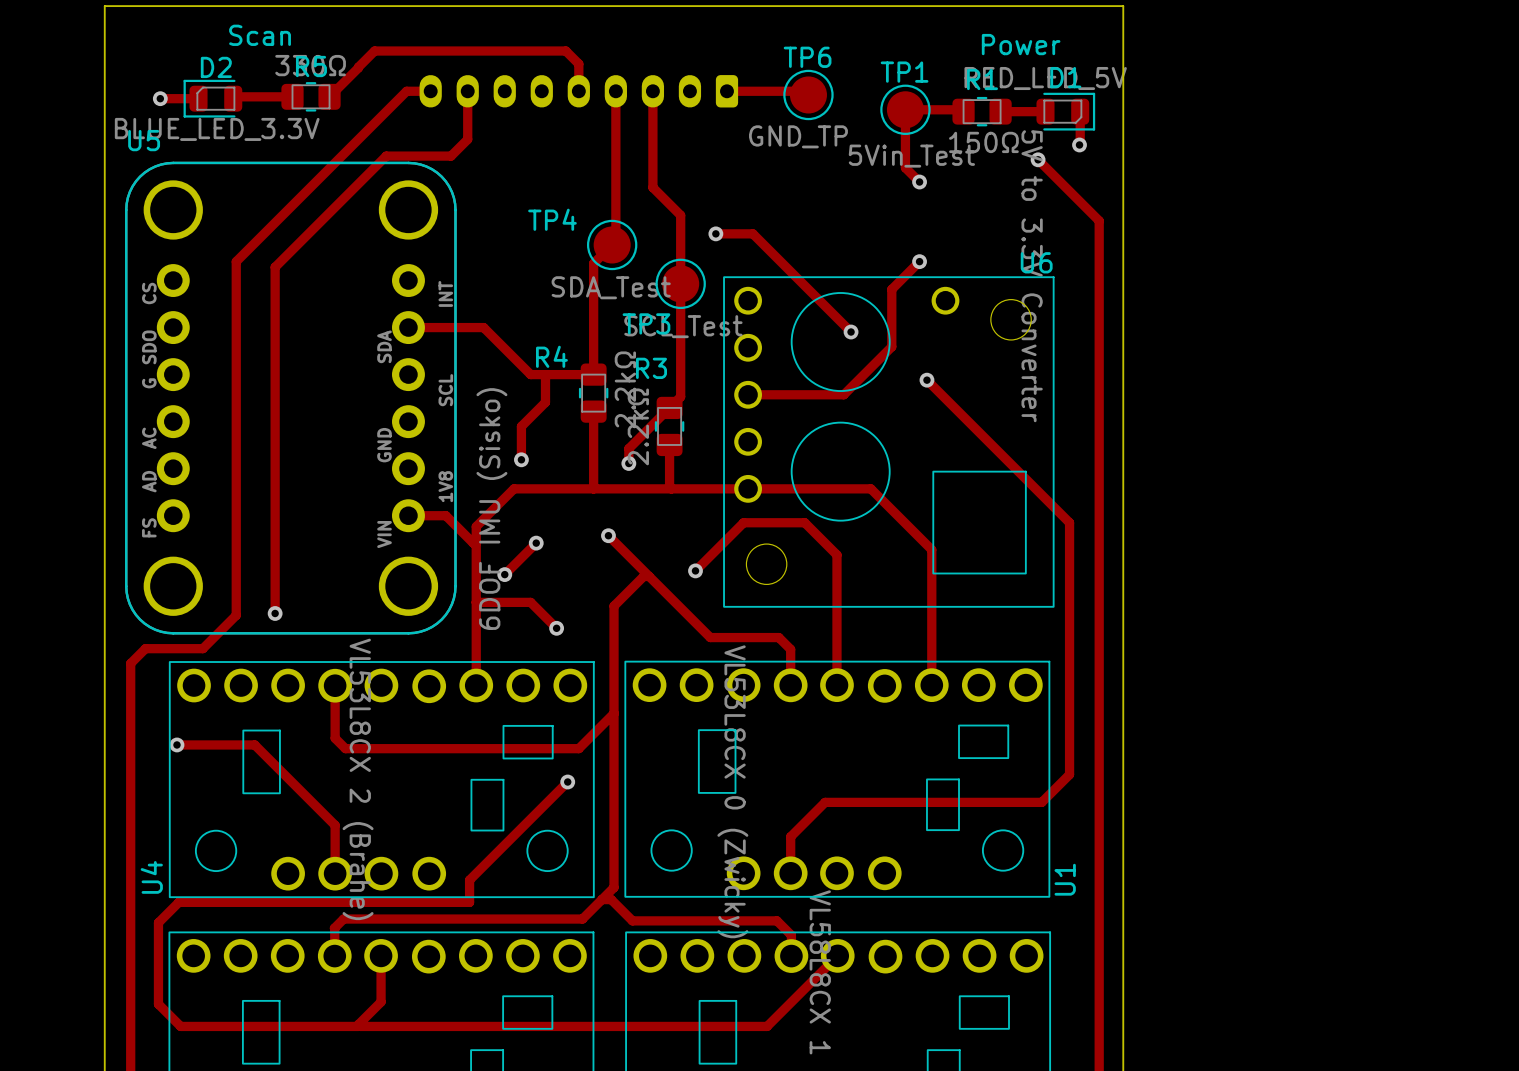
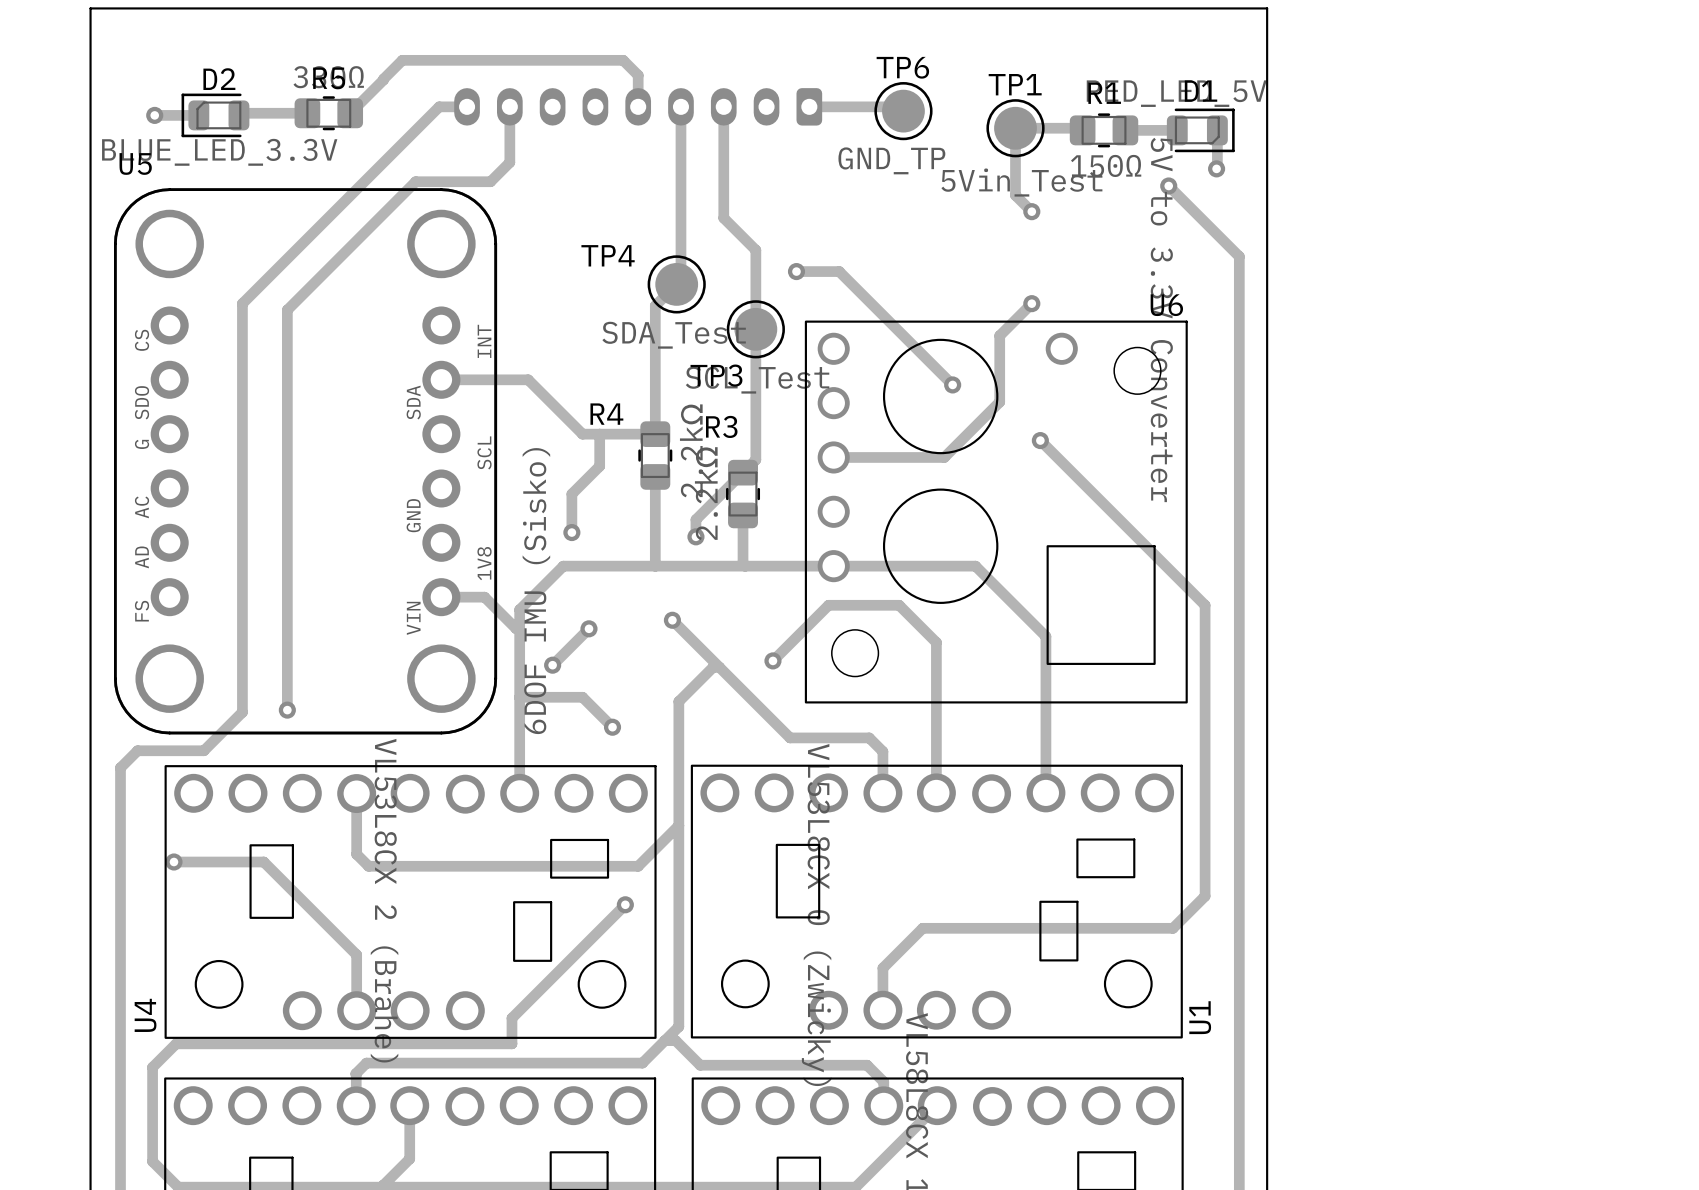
text: Scan (260, 35) -> none
text: Power (1021, 44) -> none

